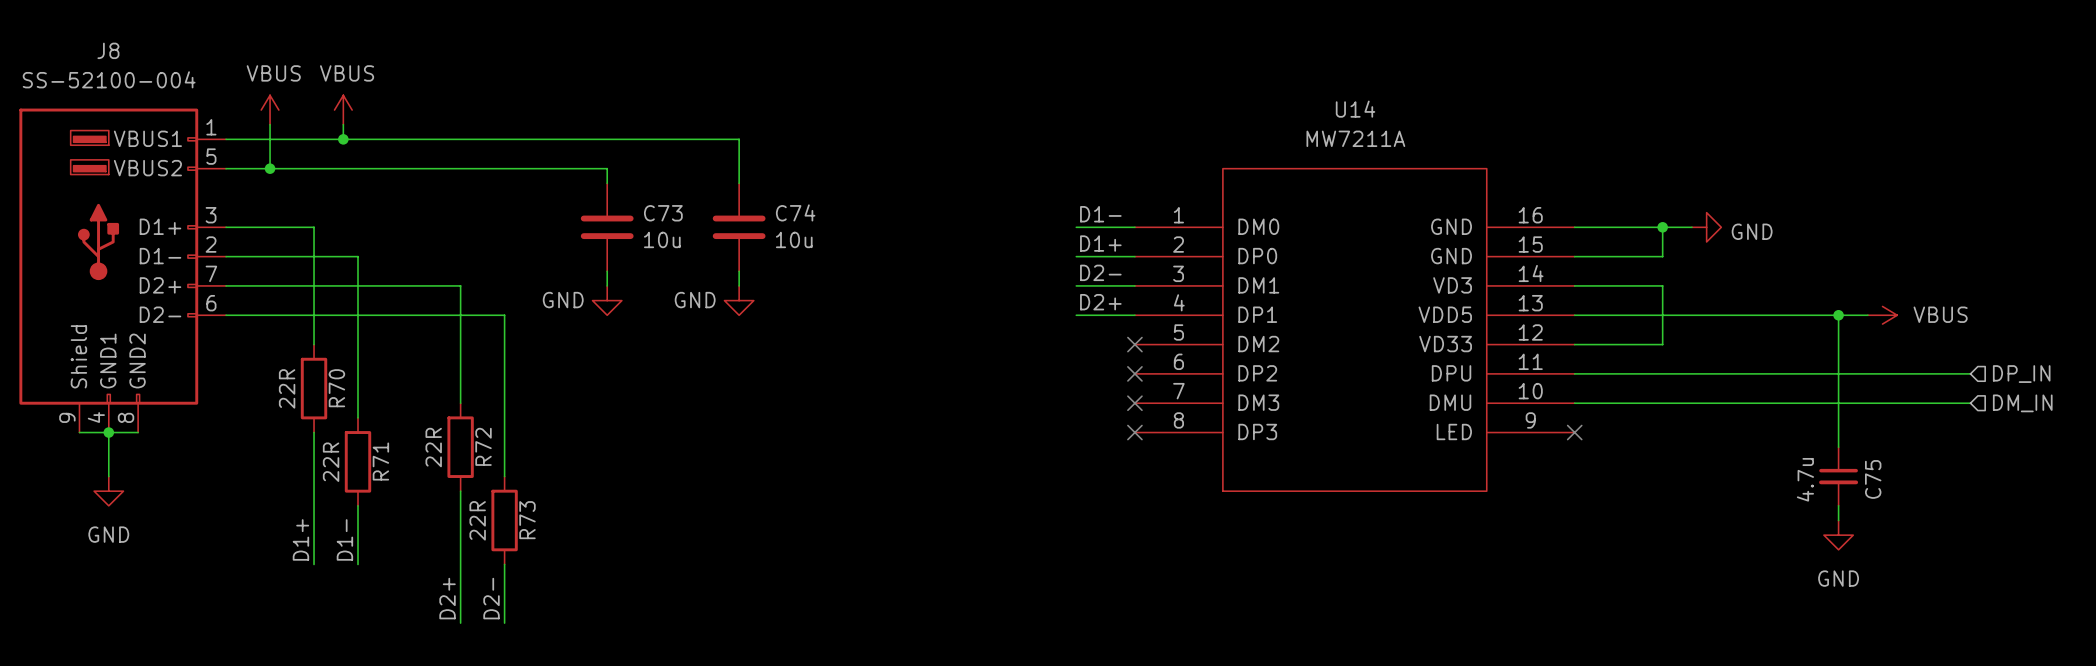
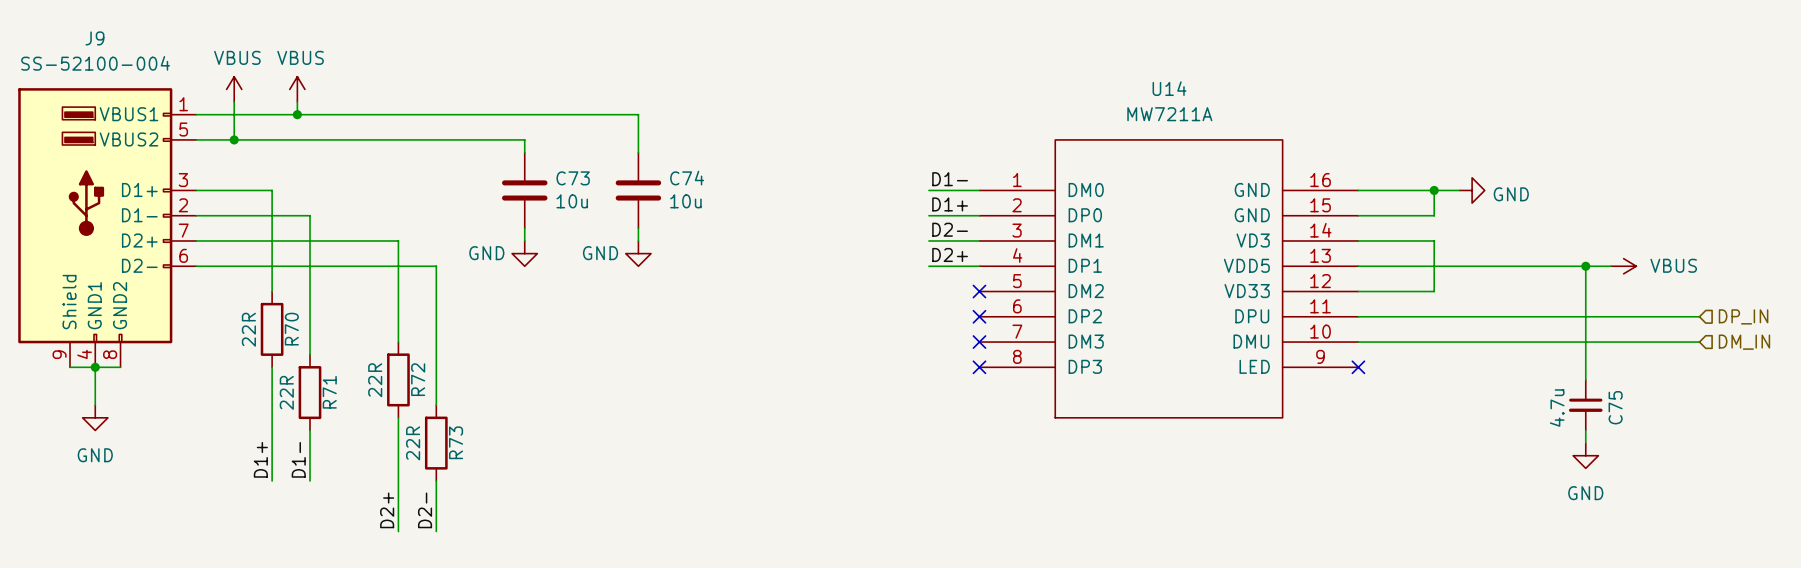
J8 name: J8 (108, 50) -> J9 (94, 38)

